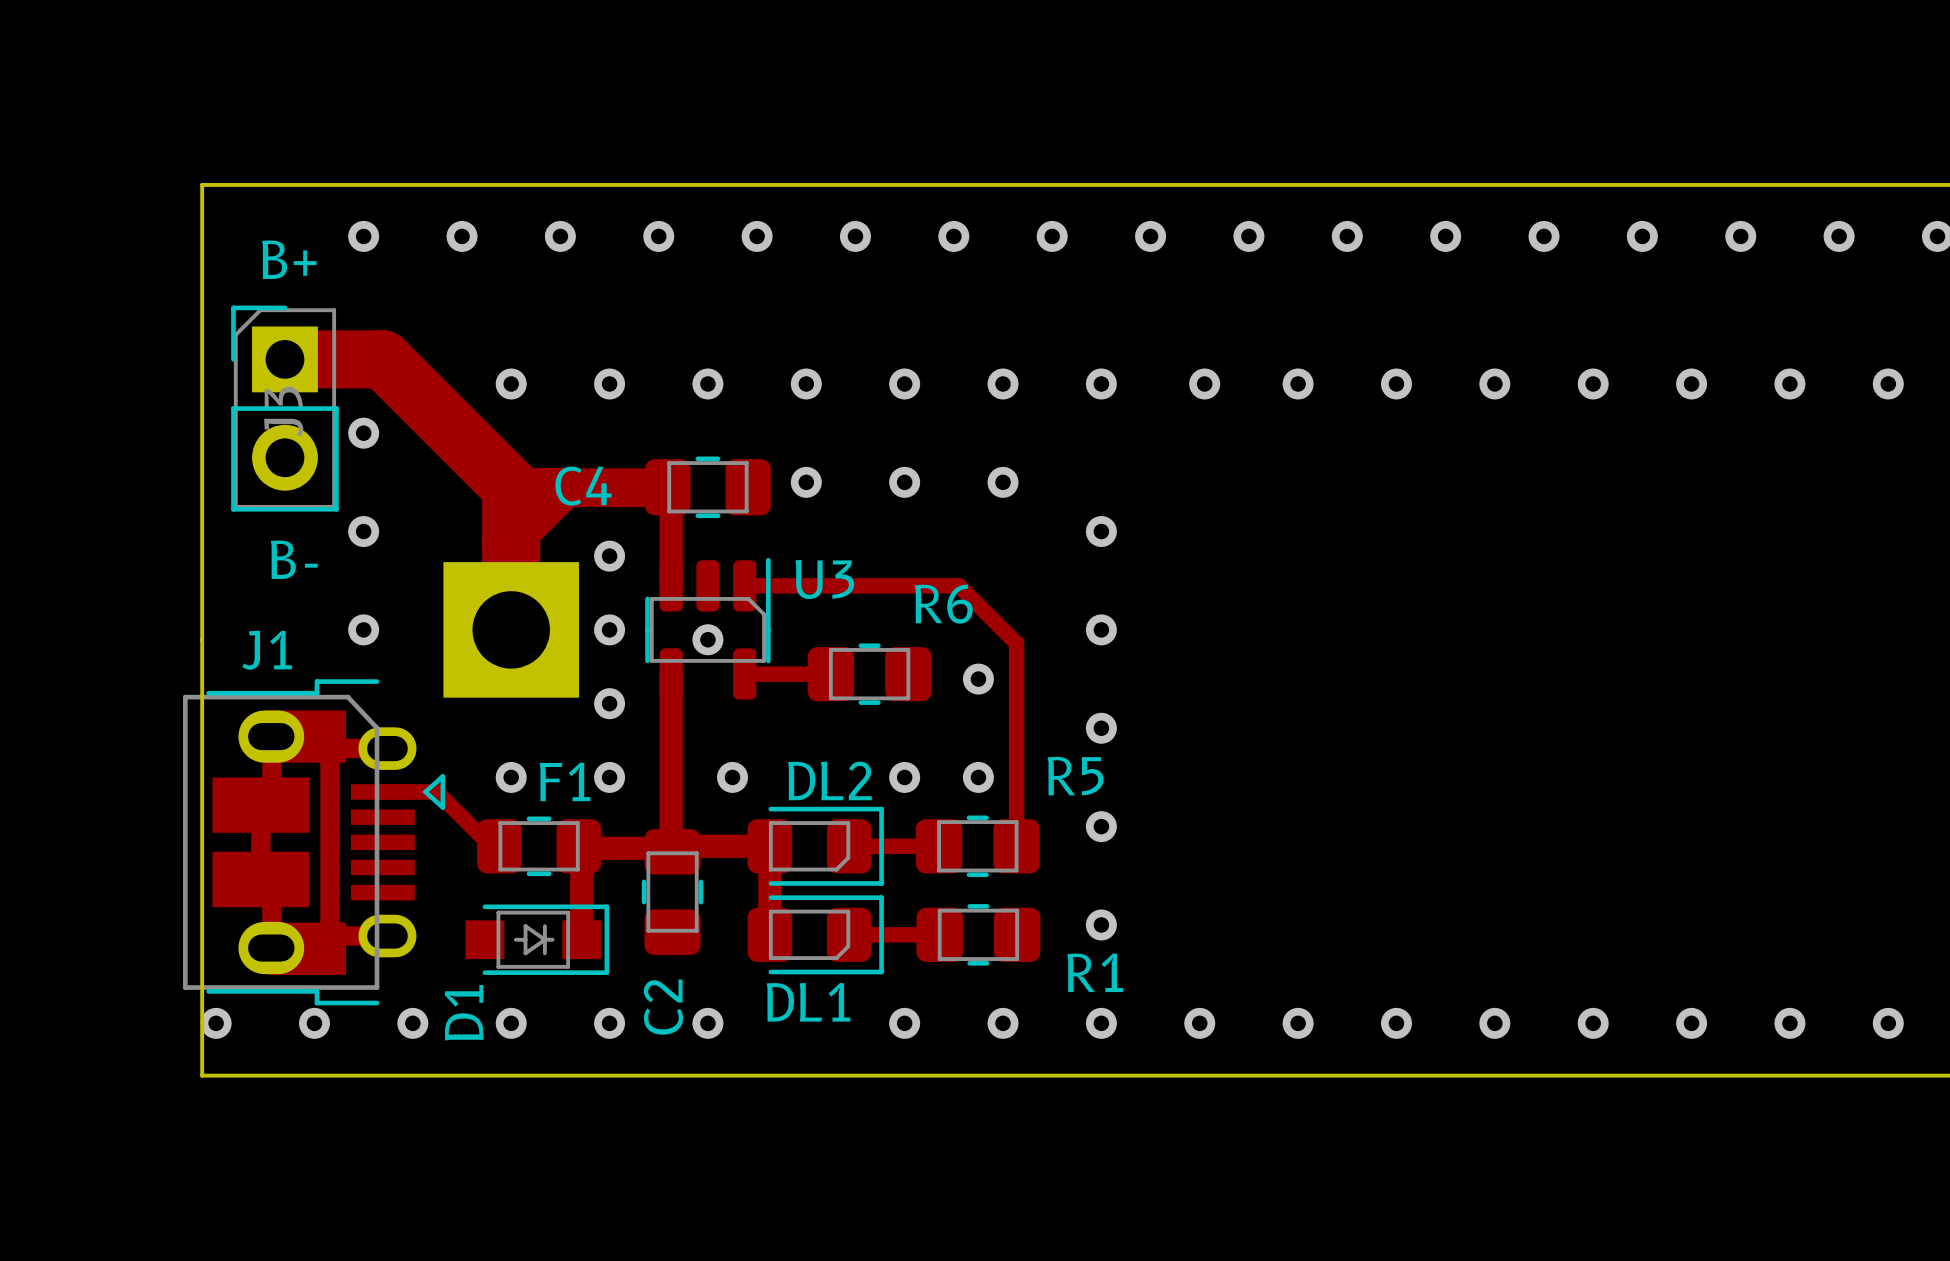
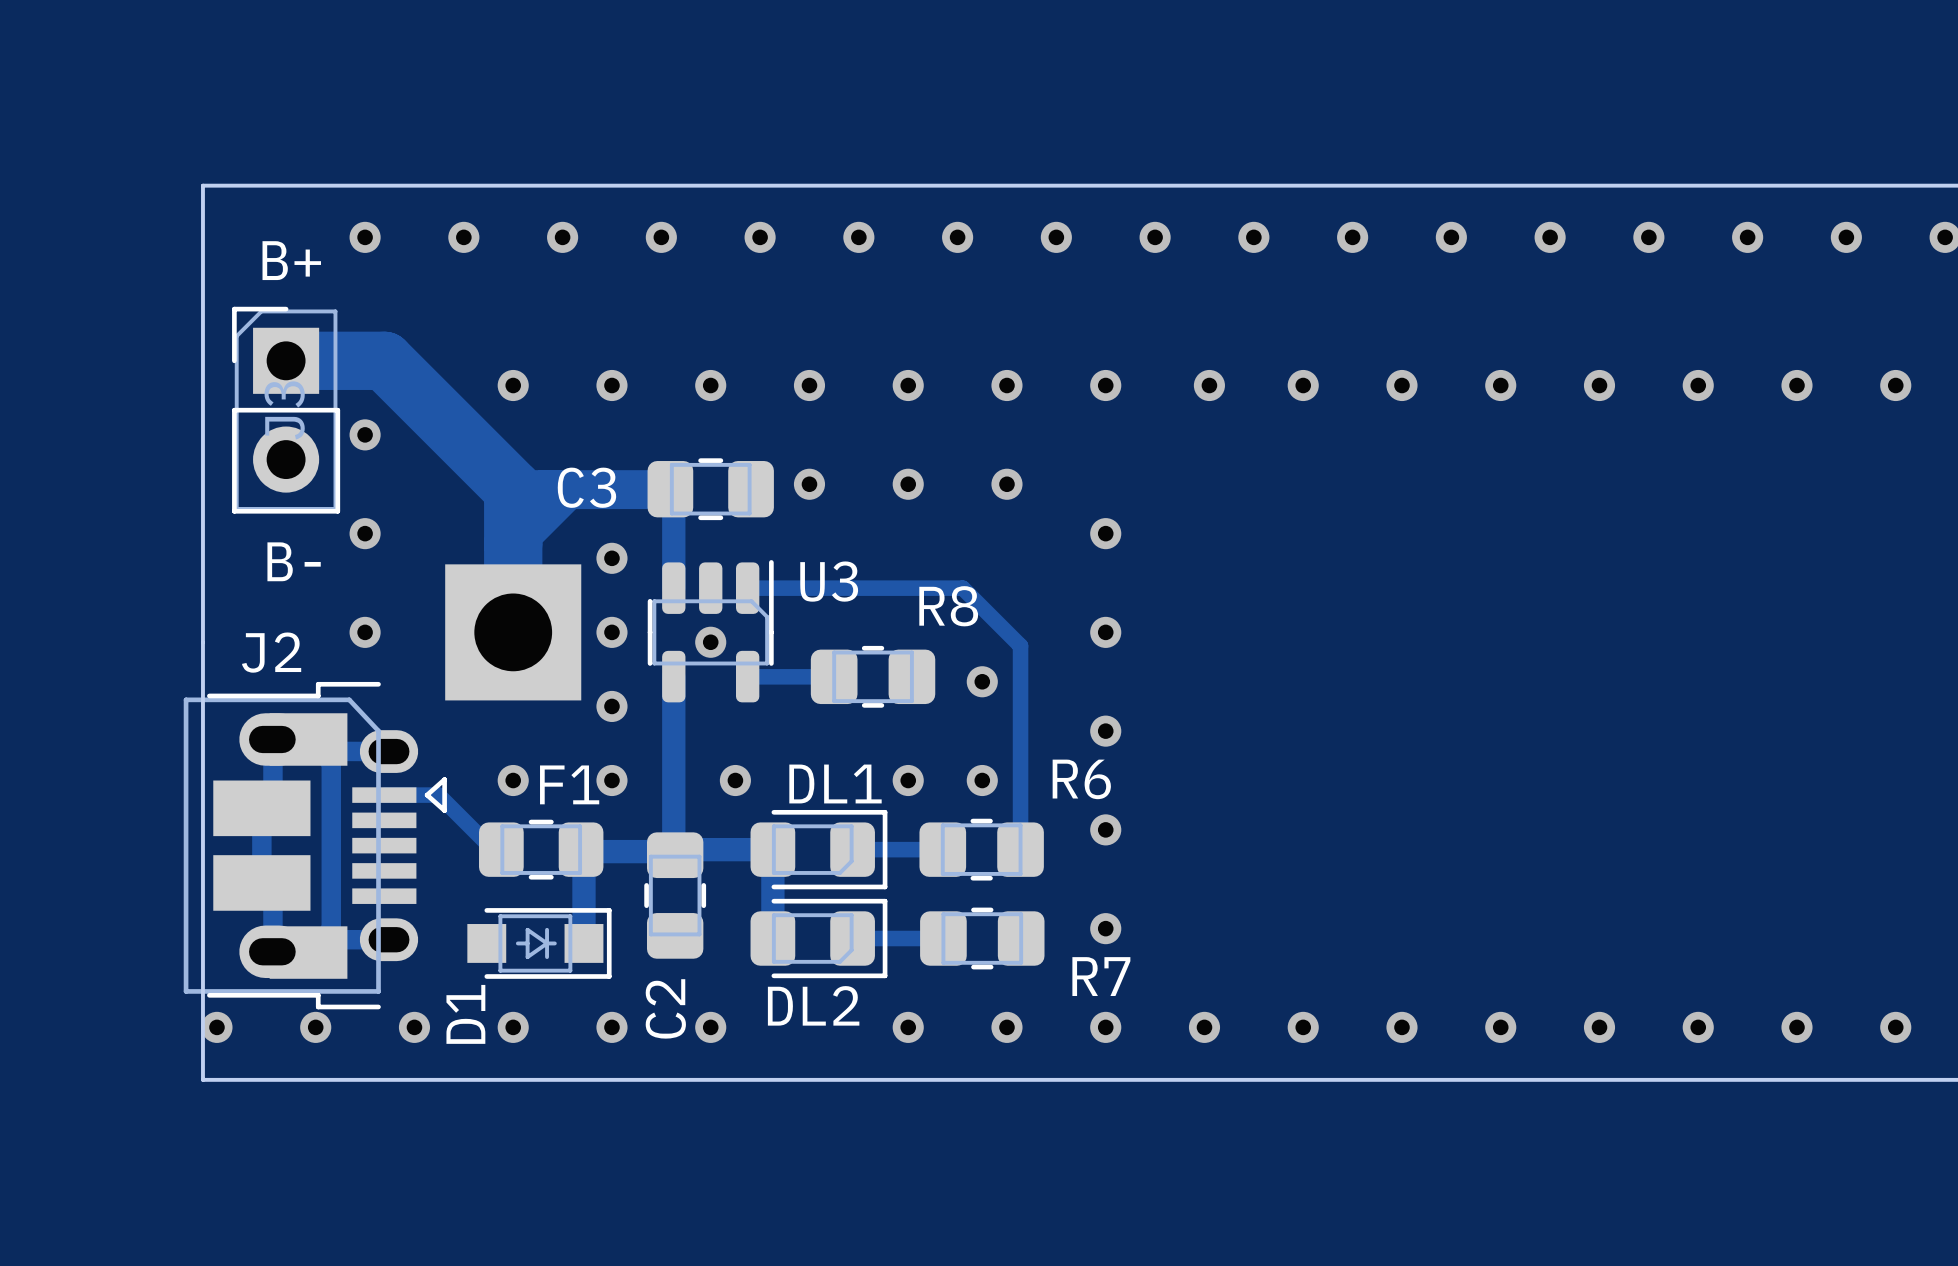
C4 name: C4 (583, 486) -> C3 (586, 487)
R6 name: R6 (943, 604) -> R8 (948, 606)
J1 name: J1 (267, 650) -> J2 (271, 652)
R5 name: R5 (1075, 776) -> R6 (1081, 779)
DL2 name: DL2 (829, 780) -> DL1 (835, 784)
R1 name: R1 (1095, 972) -> R7 (1101, 976)
DL1 name: DL1 (808, 1002) -> DL2 (813, 1005)

